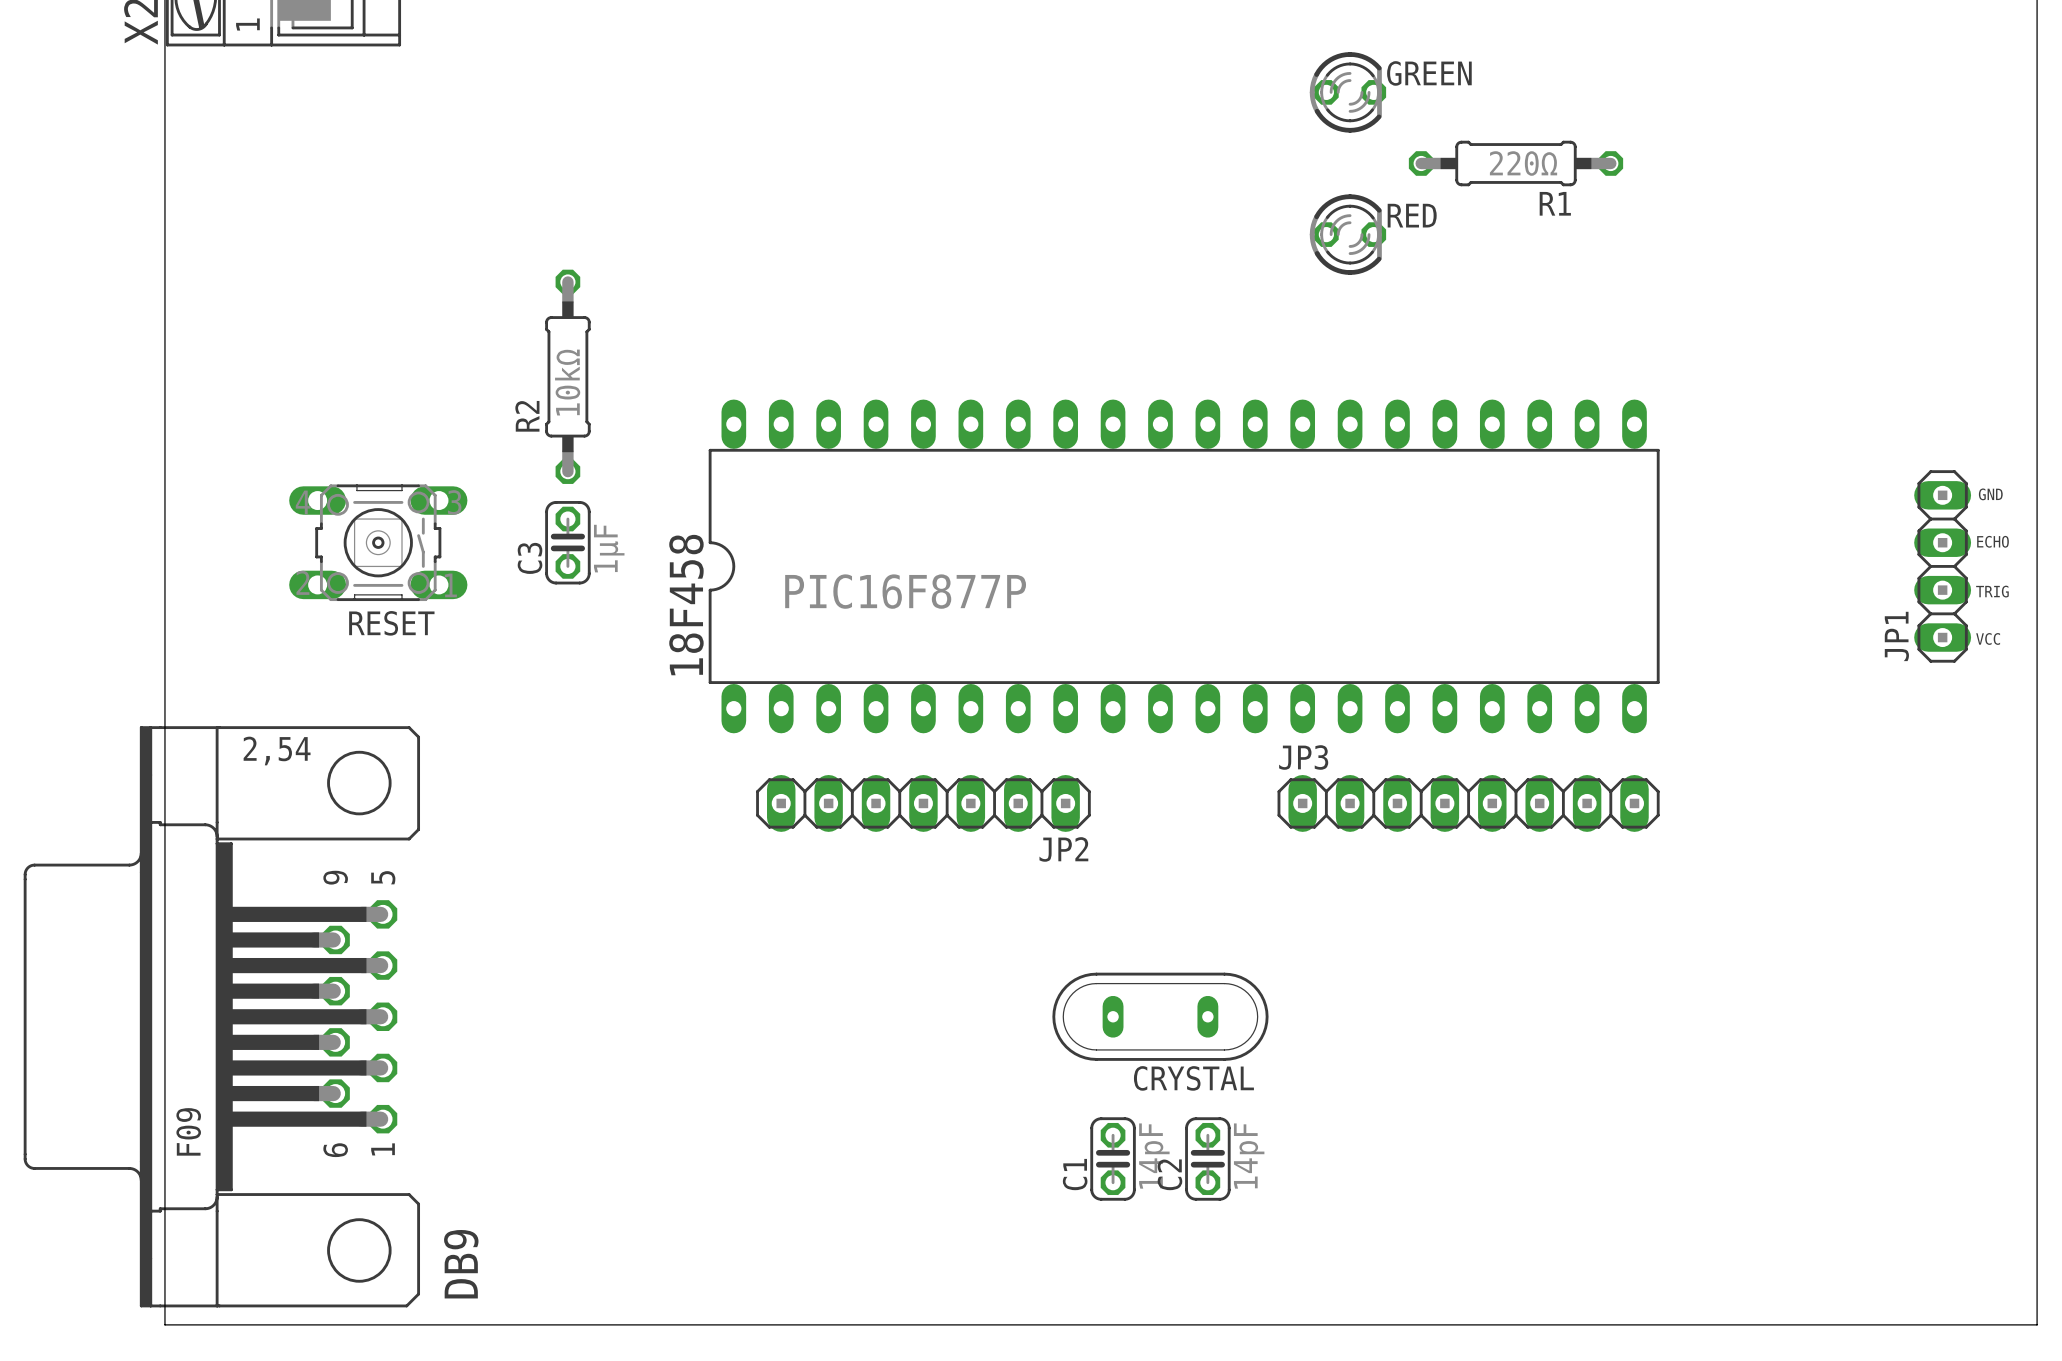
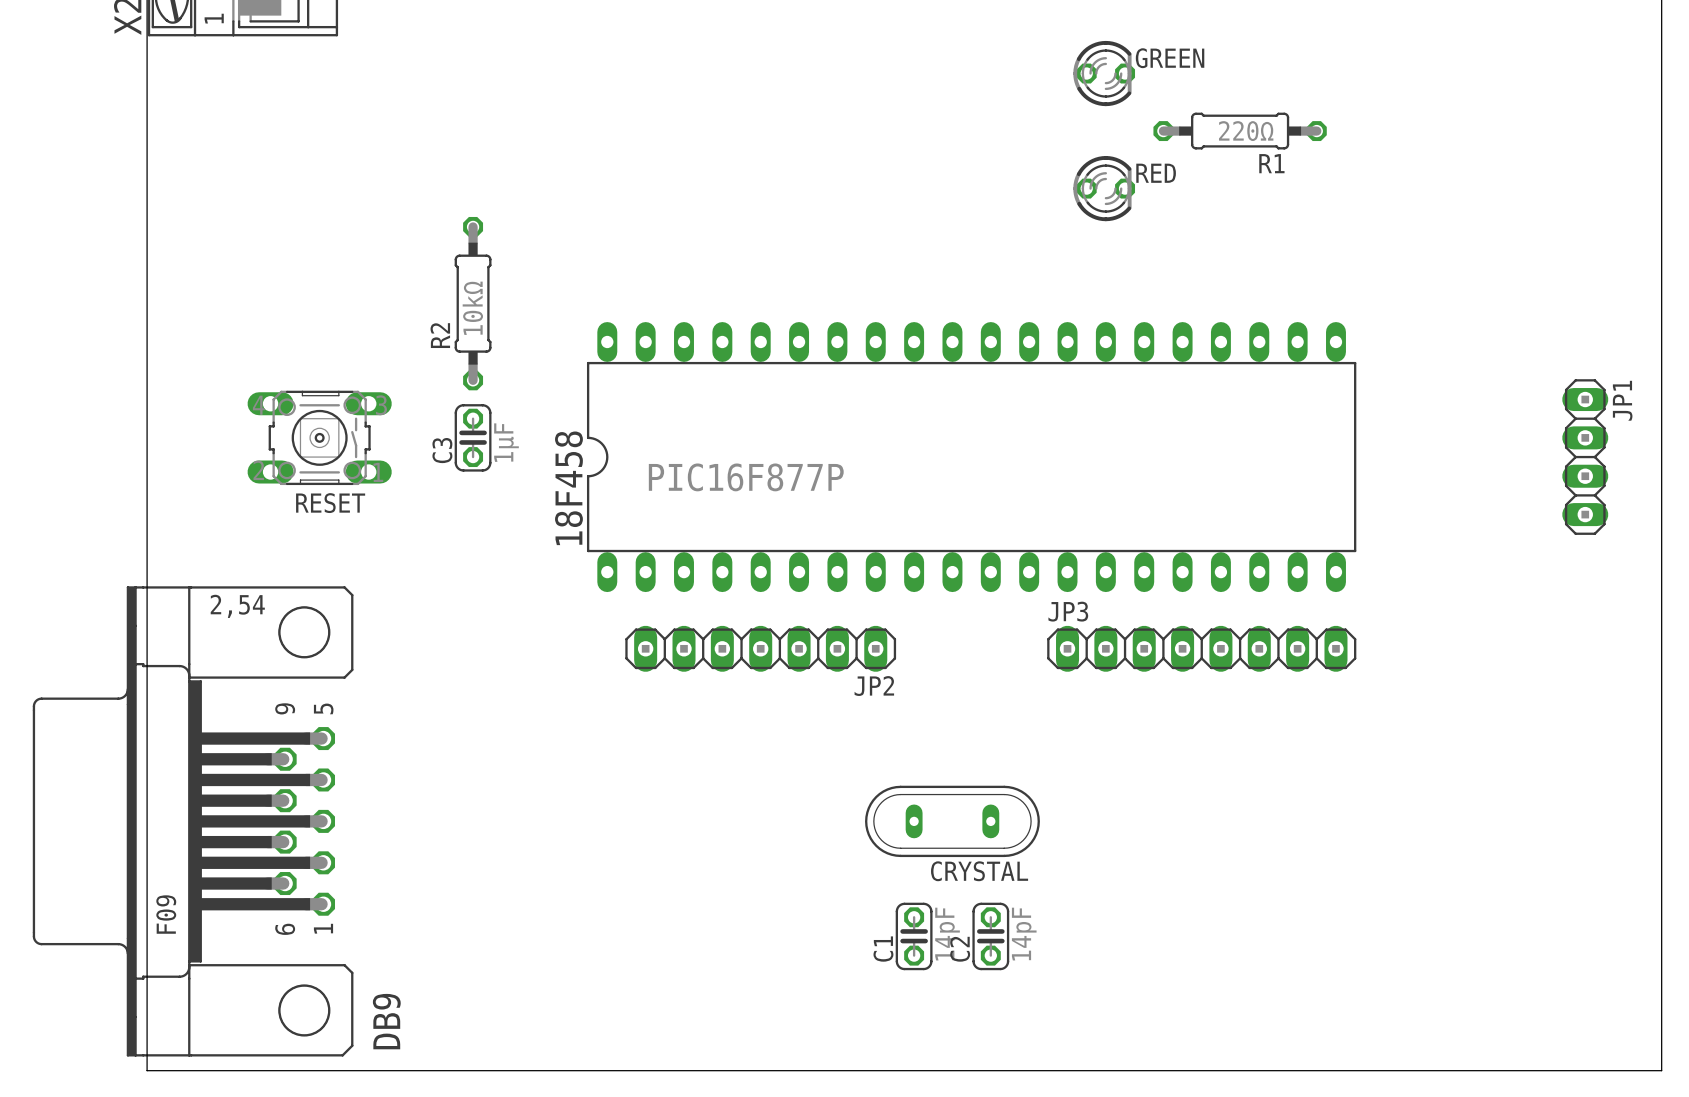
text: GND (1990, 494) -> none
text: ECHO (1993, 541) -> none
text: TRIG (1992, 591) -> none
JP1 name position: JP1 (1896, 636) -> JP1 (1622, 400)
text: VCC (1988, 638) -> none

